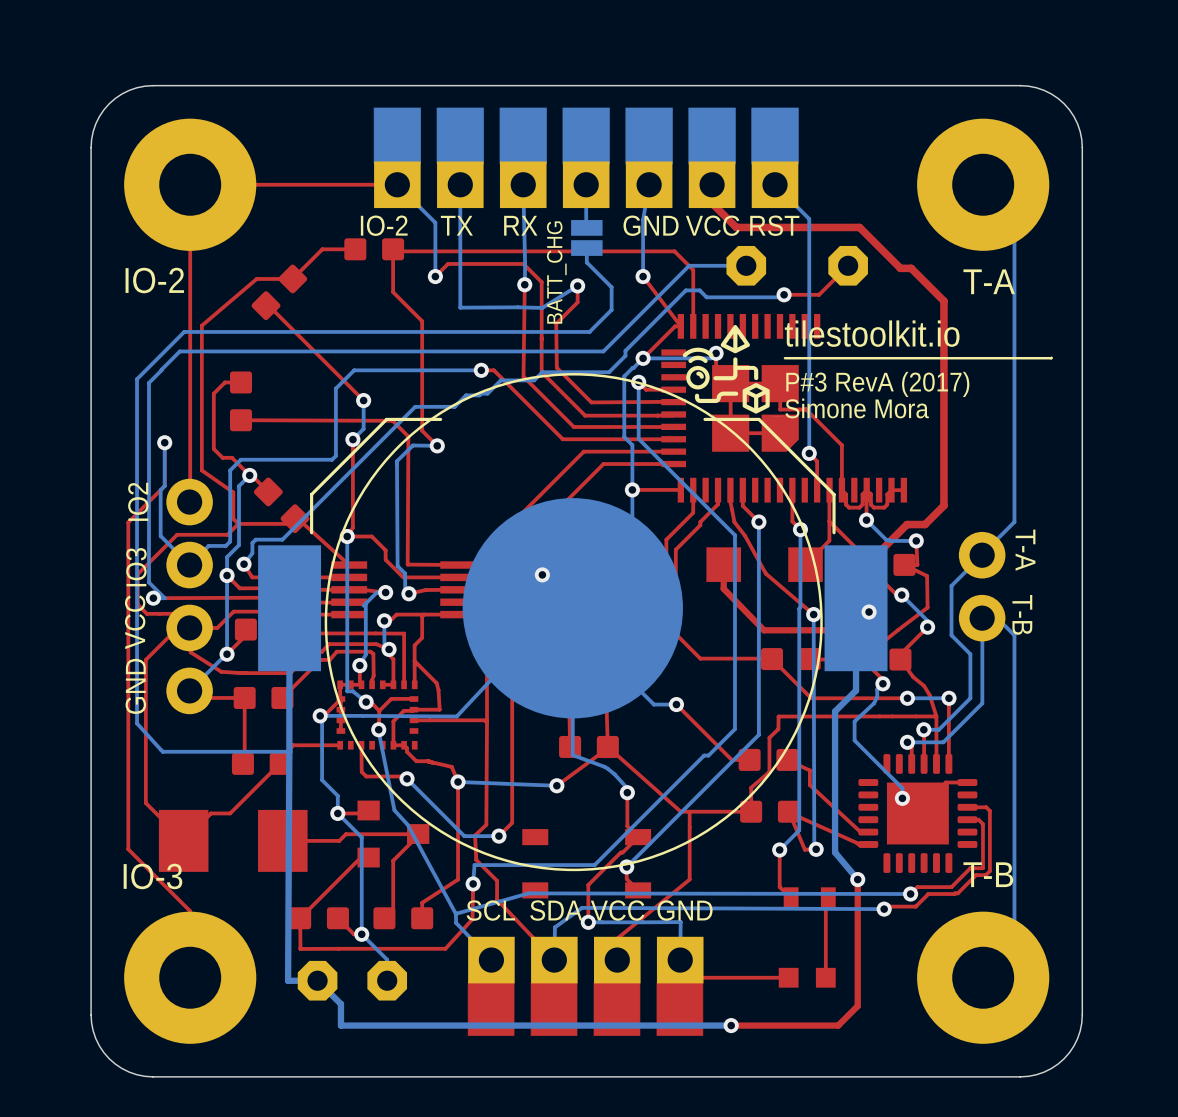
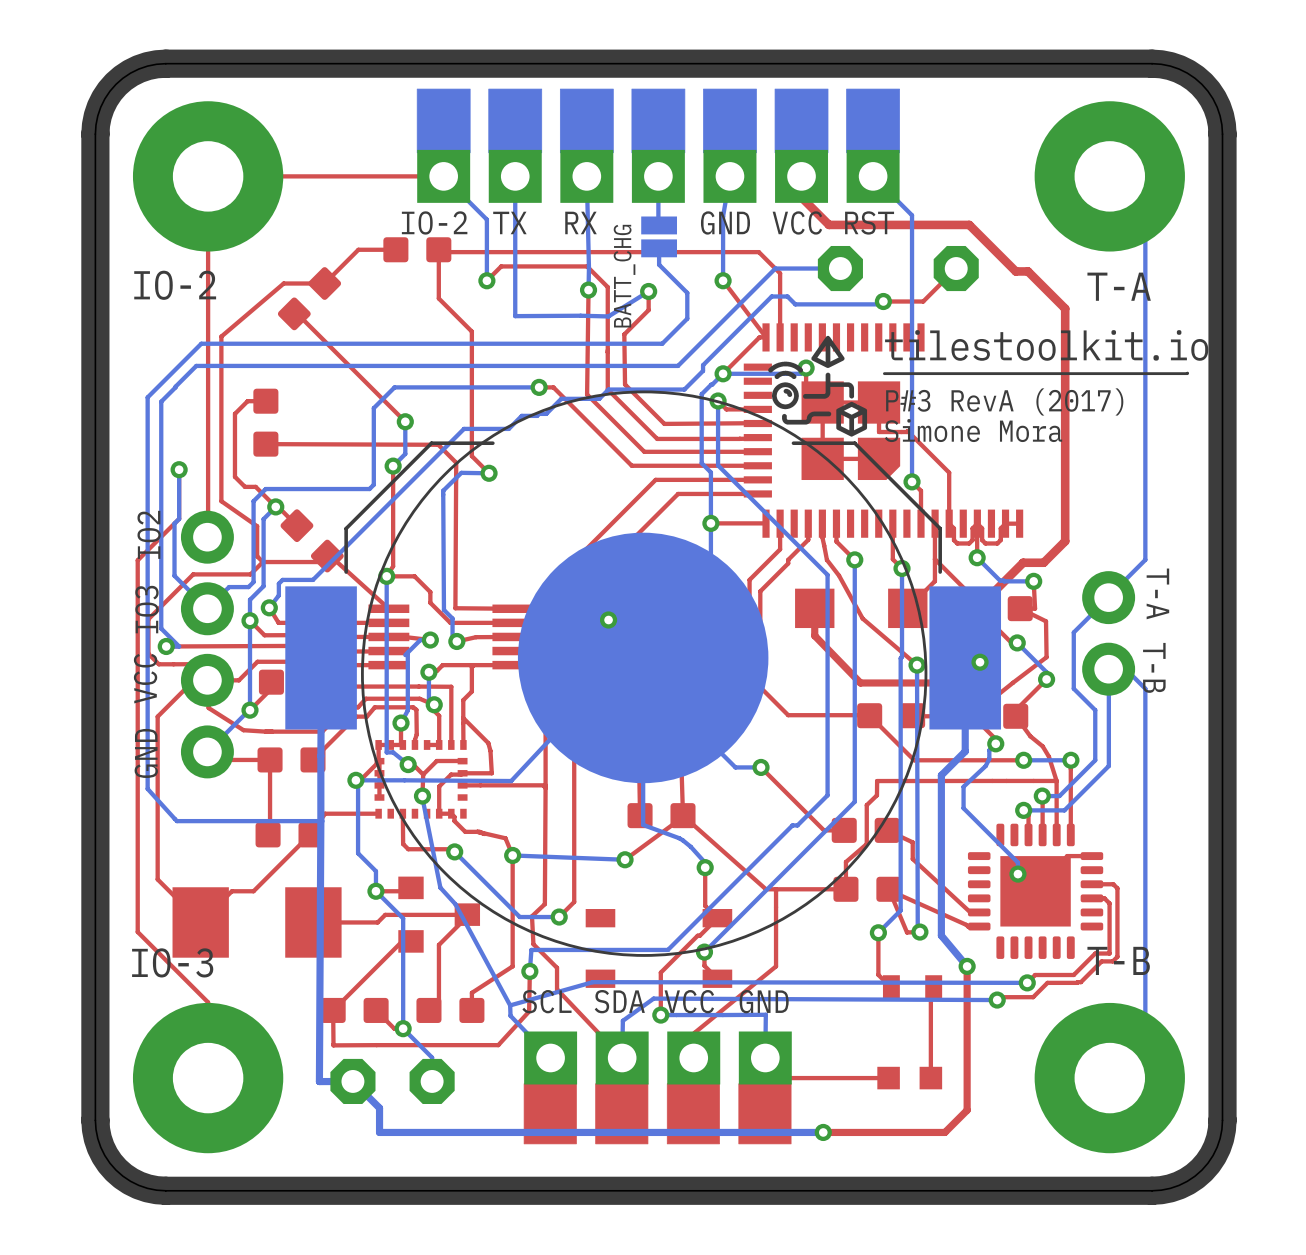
line: none -> (1152, 63) (165, 63) (138, 69) (116, 84) (100, 107) (95, 134) (95, 1120) (100, 1147) (116, 1170) (138, 1185) (165, 1190) (1152, 1190) (1179, 1185) (1201, 1170) (1217, 1147) (1222, 1120) (1222, 134) (1217, 107) (1201, 84) (1179, 69) (1152, 63)

